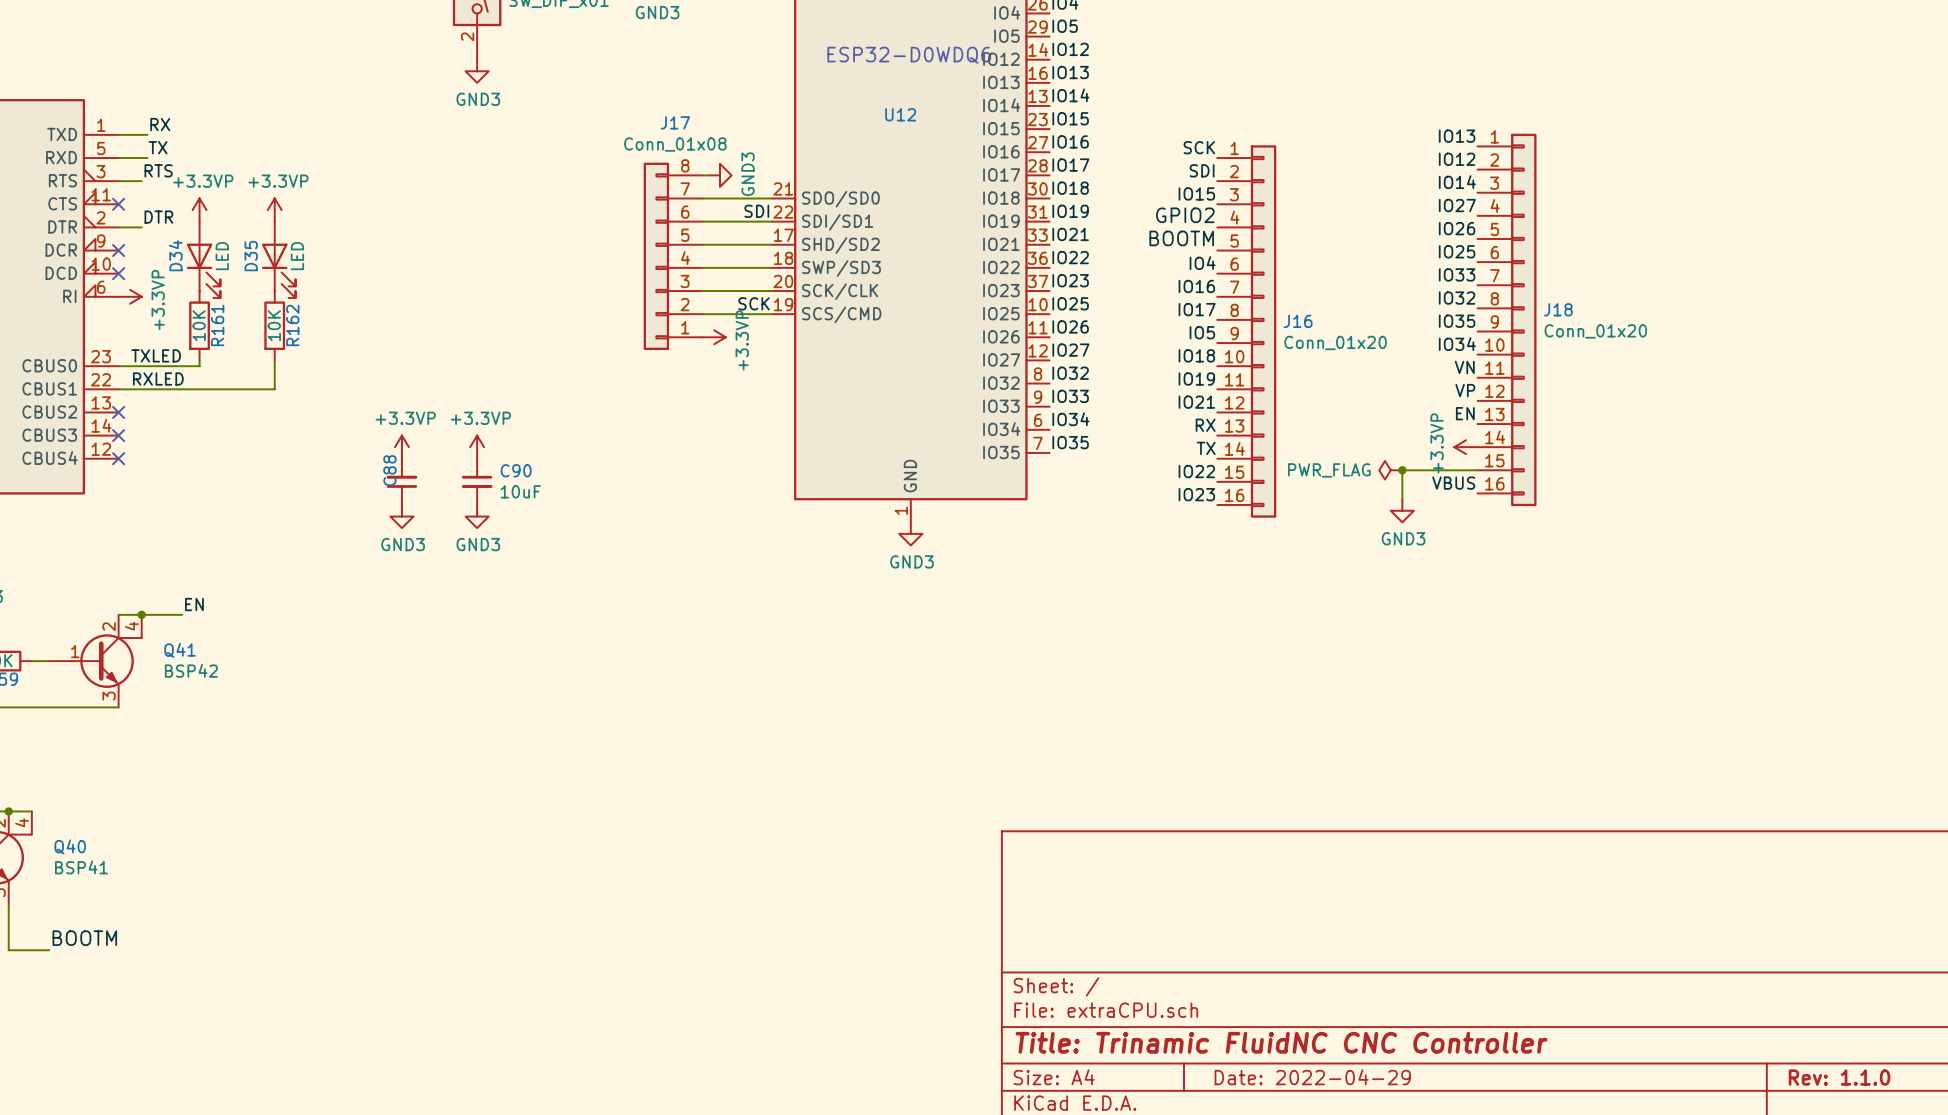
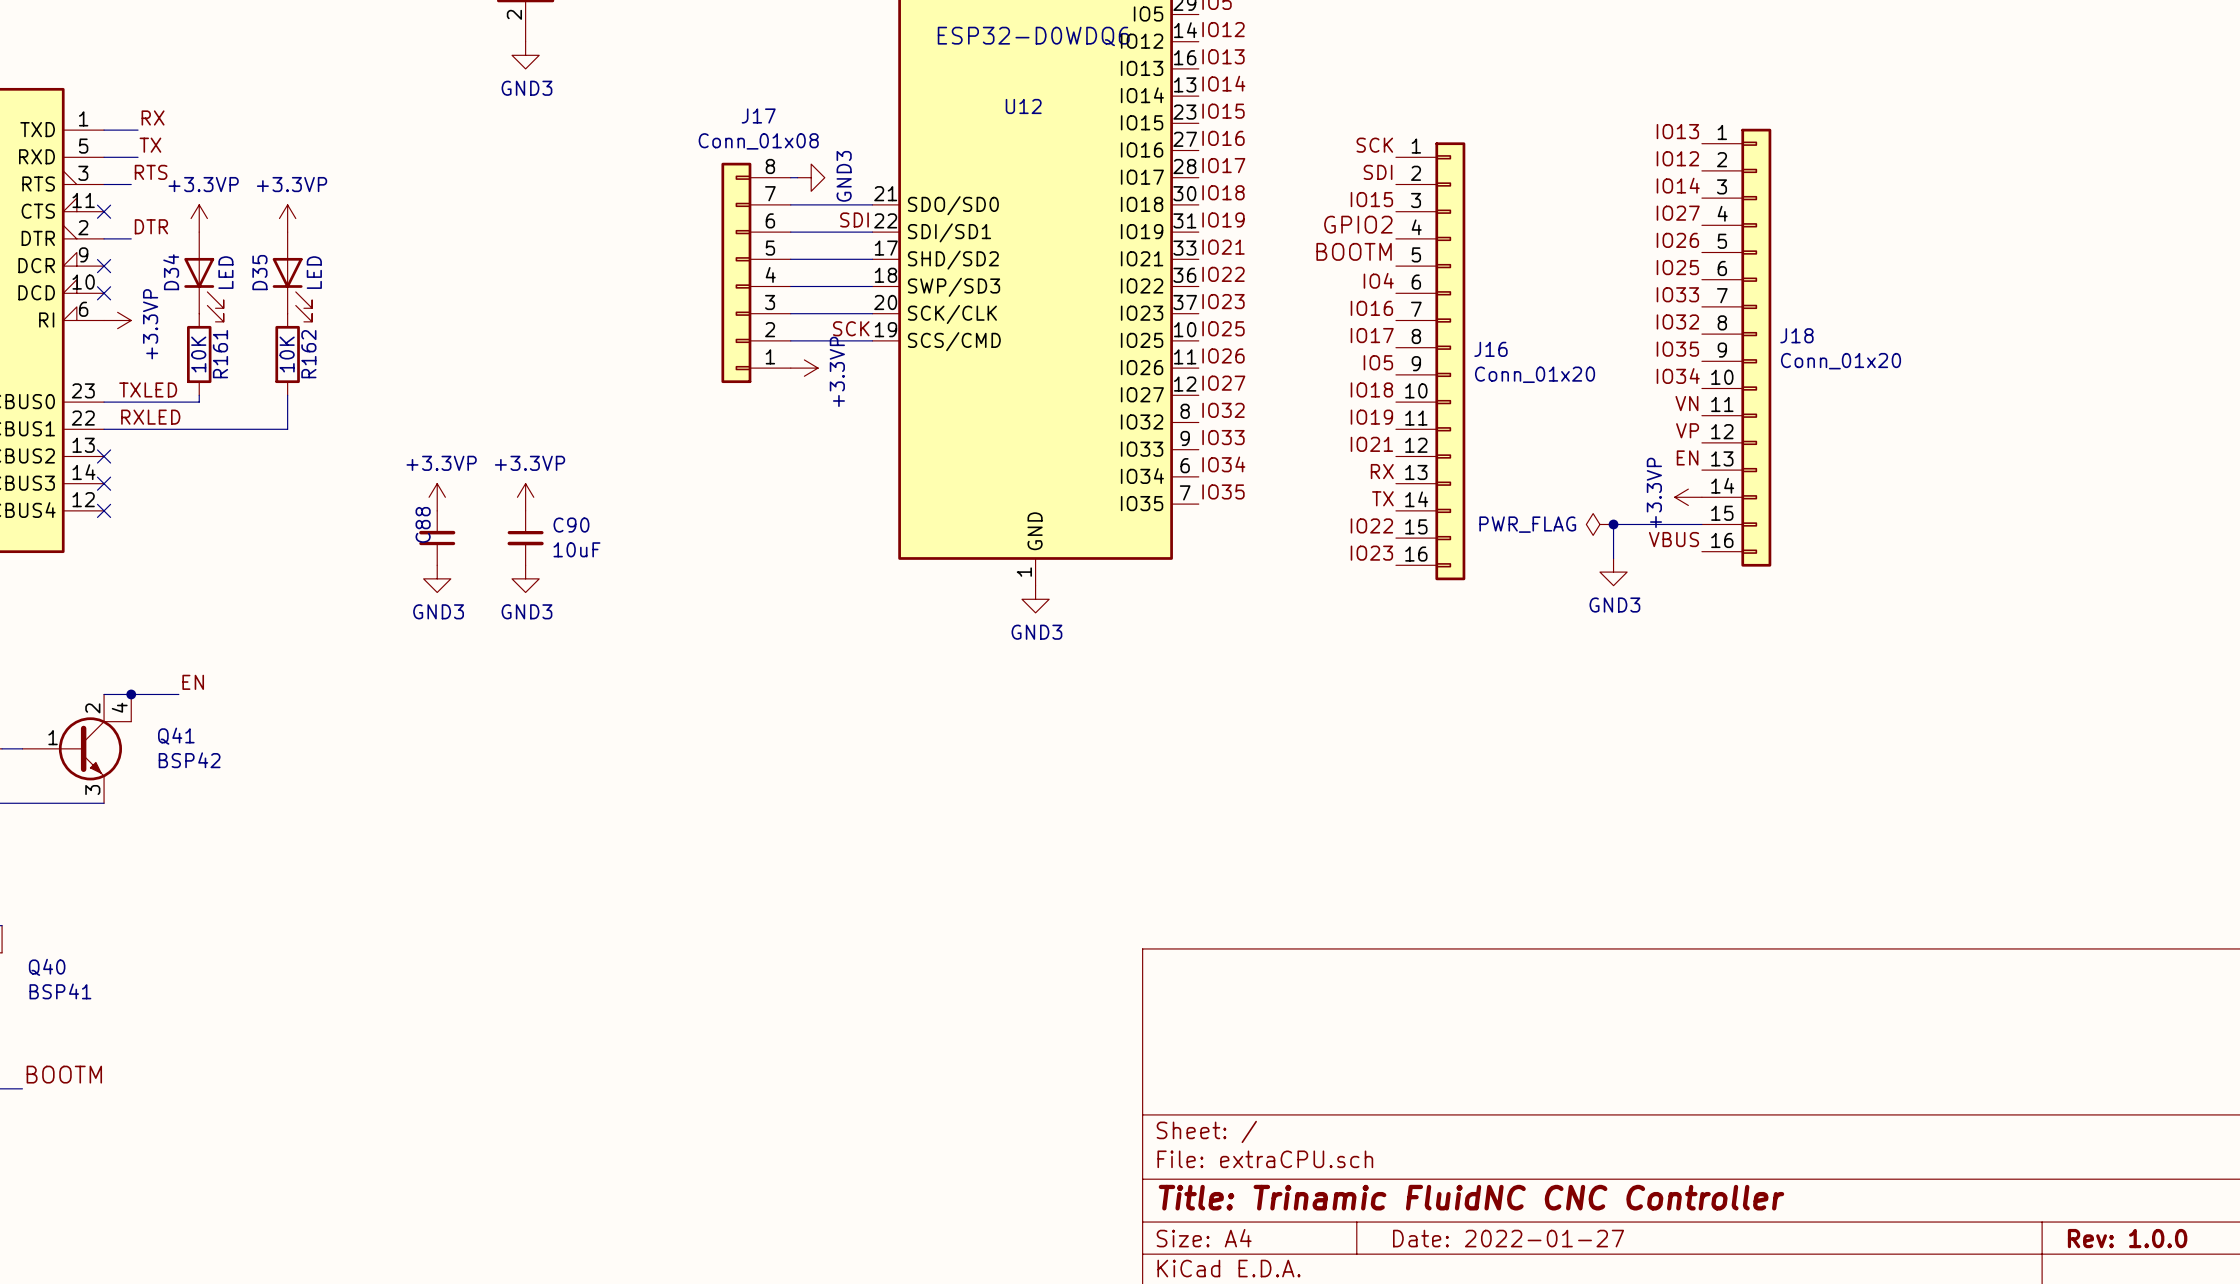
title block: Date: 2022-04-29 (1312, 1077) -> Date: 2022-01-27 (1508, 1238)
title block: Rev: 1.1.0 (1839, 1077) -> Rev: 1.0.0 (2127, 1238)

